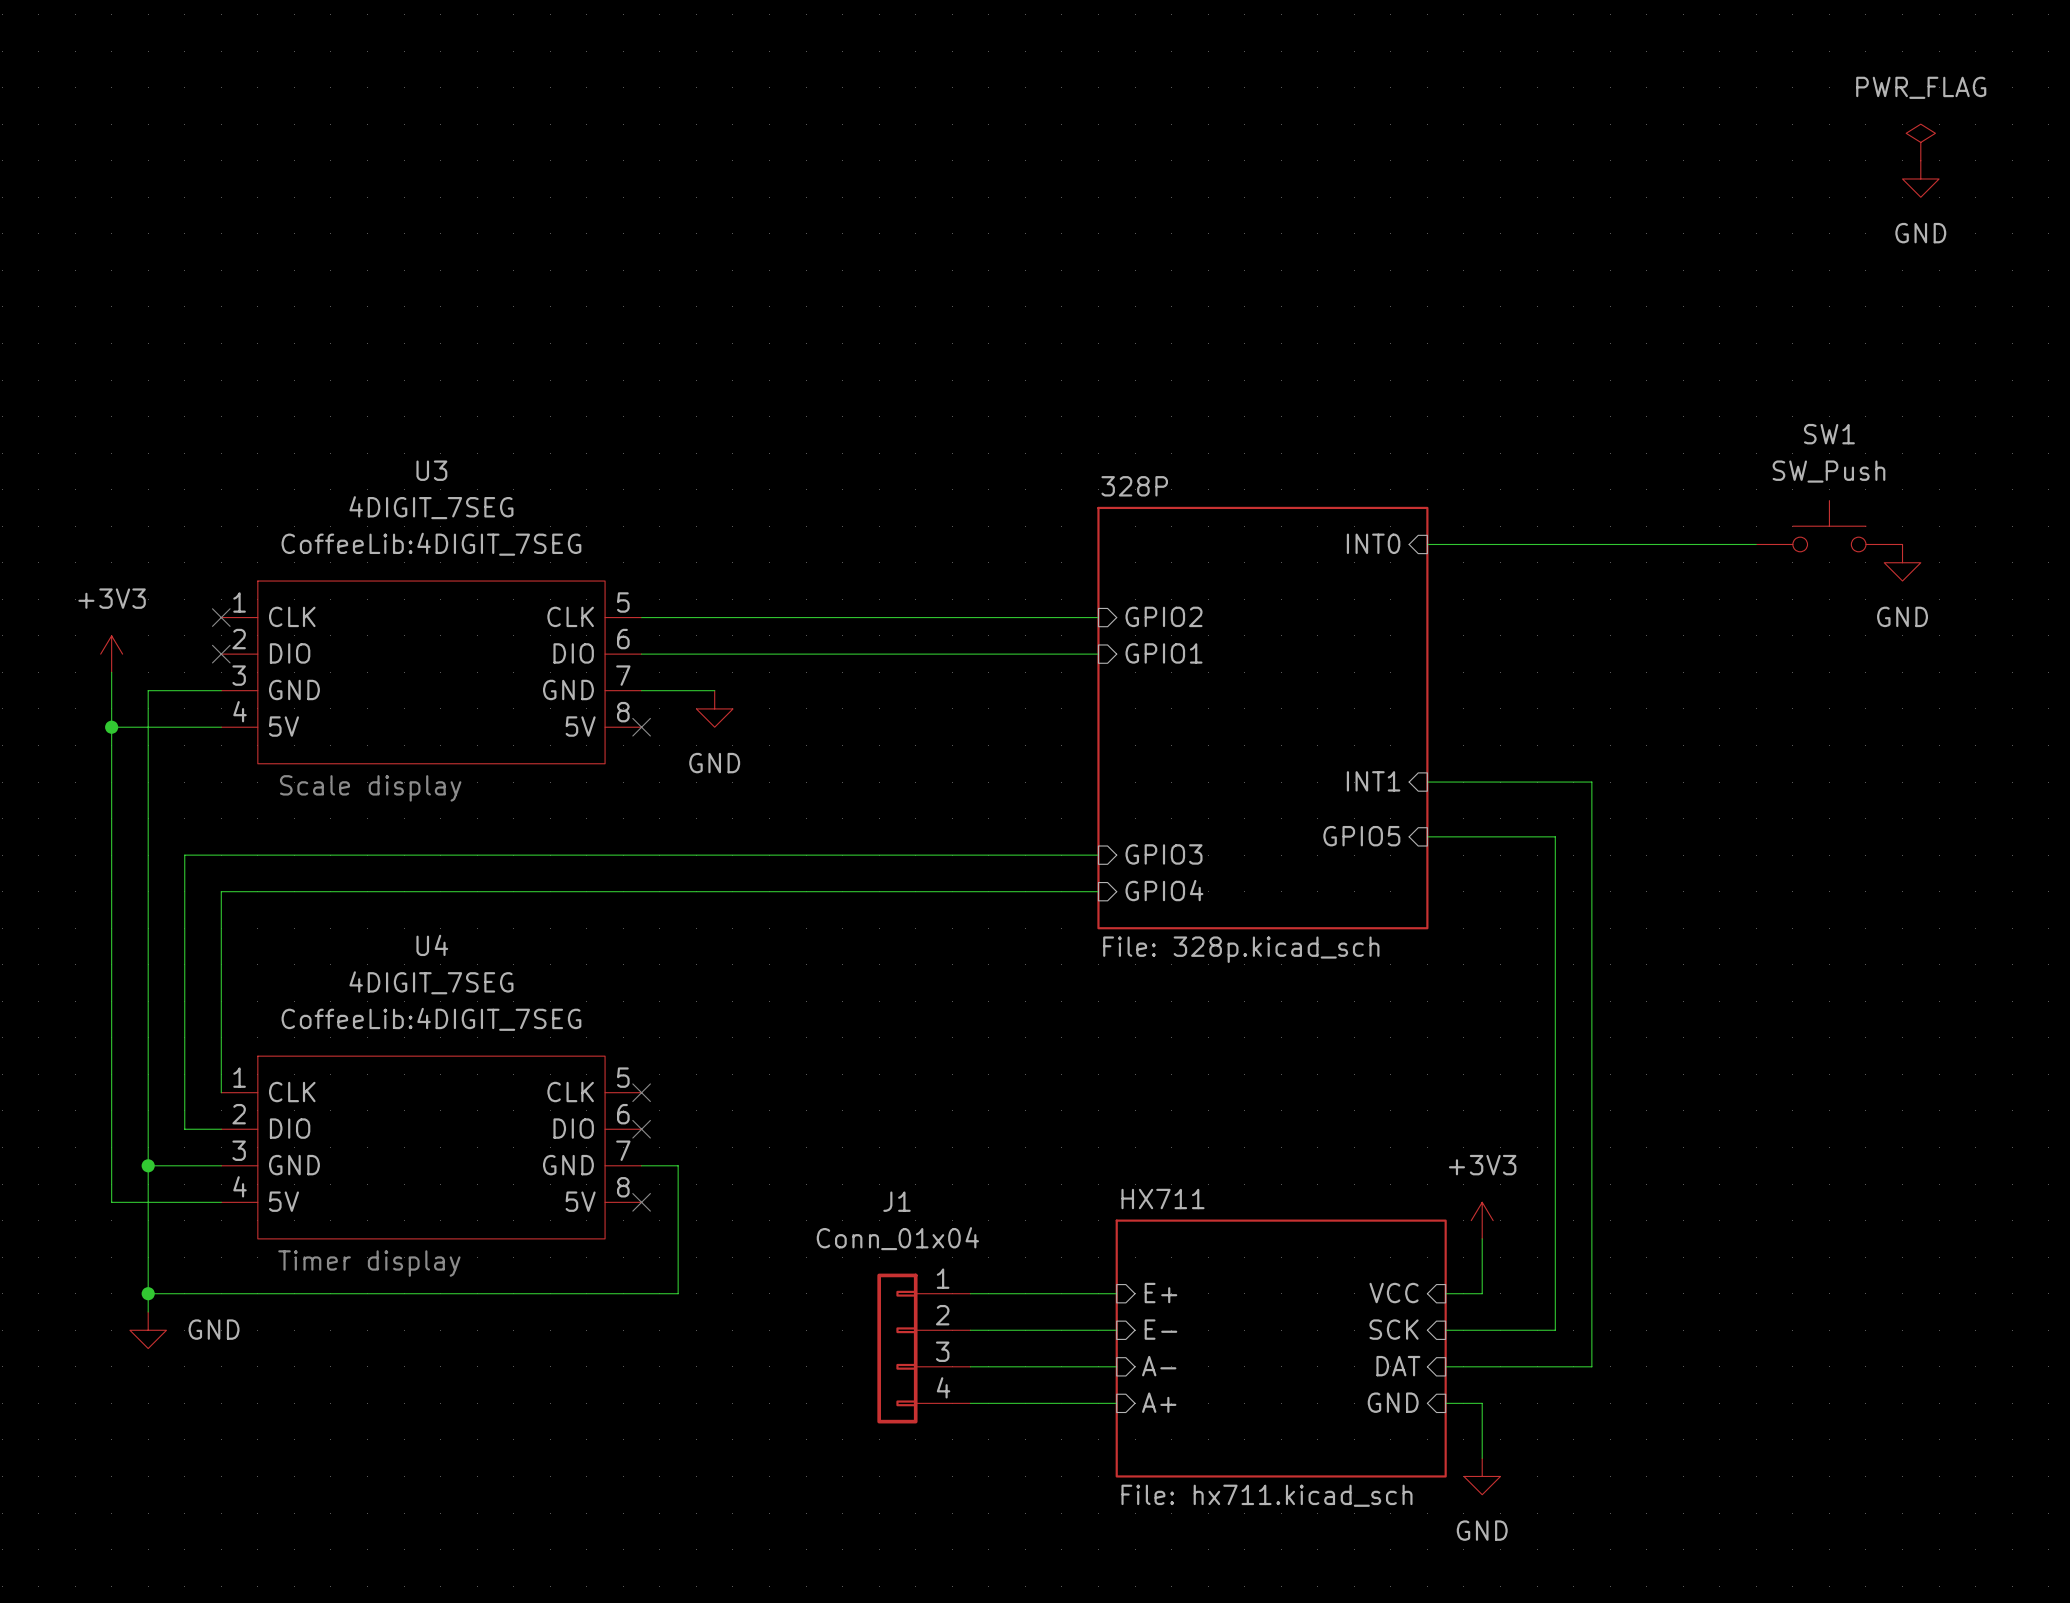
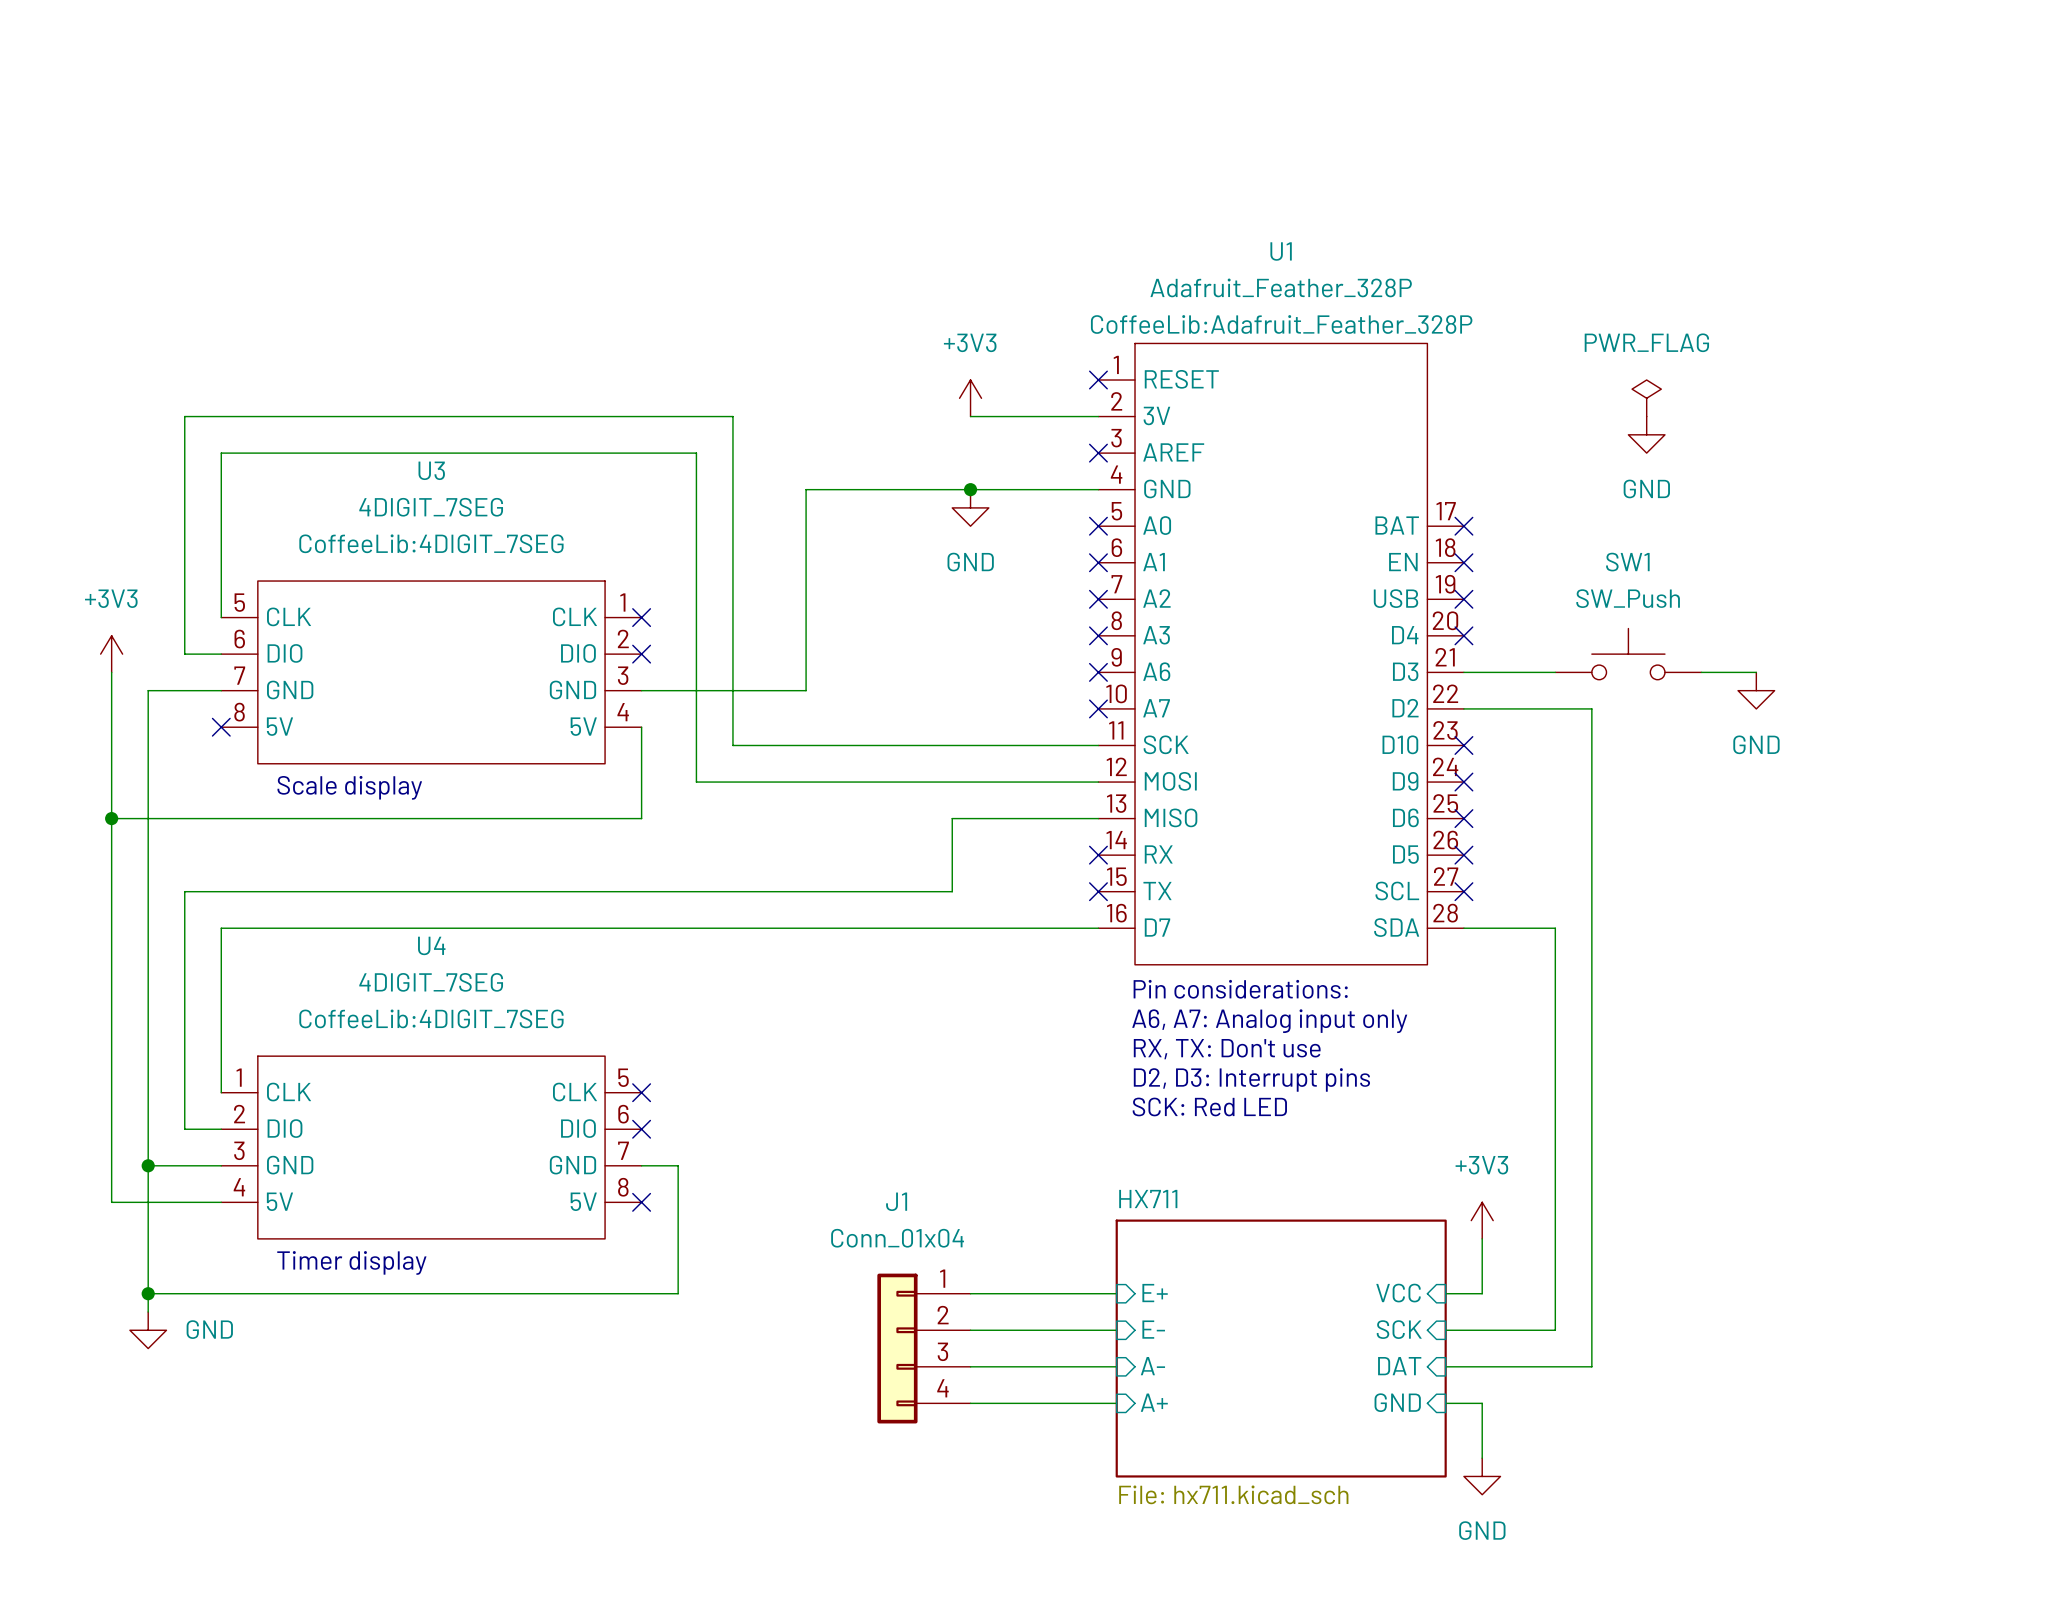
power symbol: PWR_FLAG (1920, 142) -> none
power symbol: GND (1920, 178) -> none
no-connect mark: none -> (1098, 380)
power symbol: none -> +3V3 (970, 398)
power symbol: none -> PWR_FLAG (1646, 398)
wire: none -> (970, 416) (1098, 416)
power symbol: none -> GND (1646, 434)
no-connect mark: none -> (1098, 453)
junction: none -> (970, 489)
wire: none -> (1098, 489) (806, 489) (806, 690) (714, 690)
no-connect mark: none -> (1098, 526)
no-connect mark: none -> (1463, 526)
SW1 position: (1829, 526) -> (1628, 654)
sheet pin: INT0 (1373, 543) -> none
wire: (1427, 544) (1756, 544) -> none
no-connect mark: none -> (1098, 562)
no-connect mark: none -> (1463, 562)
power symbol: GND (1902, 562) -> none
no-connect mark: none -> (1098, 599)
no-connect mark: none -> (1463, 599)
sheet pin: GPIO2 (1164, 616) -> none
wire: none -> (221, 617) (221, 453) (696, 453) (696, 782) (1098, 782)
no-connect mark: (221, 617) -> none
wire: (641, 617) (1098, 617) -> none
no-connect mark: none -> (641, 617)
no-connect mark: none -> (1098, 635)
no-connect mark: none -> (1463, 635)
sheet pin: GPIO1 (1164, 653) -> none
wire: none -> (221, 654) (184, 654) (184, 416) (732, 416) (732, 745) (1098, 745)
no-connect mark: (221, 654) -> none
wire: (641, 654) (1098, 654) -> none
no-connect mark: none -> (641, 654)
U1: none -> Adafruit_Feather_328P (1281, 654)
U3 flip: as is (431, 672) -> left-right (431, 672)
no-connect mark: none -> (1098, 672)
wire: none -> (1463, 672) (1555, 672)
wire: none -> (1701, 672) (1756, 672)
power symbol: none -> GND (1756, 690)
power symbol position: GND (714, 708) -> GND (970, 507)
no-connect mark: none -> (1098, 708)
sheet 328P: File: 328p.kicad_sch (1262, 718) -> none
wire: (111, 727) (221, 727) -> none
junction: (111, 727) -> none
no-connect mark: none -> (221, 727)
wire: none -> (641, 727) (641, 818) (111, 818)
no-connect mark: (641, 727) -> none
no-connect mark: none -> (1463, 745)
sheet pin: INT1 (1373, 781) -> none
wire: (1427, 782) (1591, 782) -> (1463, 708) (1591, 708) (1591, 782)
no-connect mark: none -> (1463, 782)
junction: none -> (111, 818)
no-connect mark: none -> (1463, 818)
sheet pin: GPIO5 (1361, 836) -> none
wire: (1427, 836) (1555, 836) (1555, 928) -> (1463, 928) (1555, 928)
sheet pin: GPIO3 (1164, 854) -> none
wire: (1098, 855) (184, 855) (184, 891) -> none
no-connect mark: none -> (1098, 855)
no-connect mark: none -> (1463, 855)
sheet pin: GPIO4 (1164, 890) -> none
wire: (221, 891) (221, 928) -> (221, 891) (184, 891)
wire: (952, 891) (1098, 891) -> (952, 891) (952, 818) (1098, 818)
no-connect mark: none -> (1098, 891)
no-connect mark: none -> (1463, 891)
wire: none -> (221, 928) (1098, 928)
text: none -> Pin considerations: (1240, 989)
text: none -> A6, A7: Analog input only (1269, 1021)
text: none -> RX, TX: Don't use (1227, 1049)
text: none -> D2, D3: Interrupt pins (1251, 1079)
text: none -> SCK: Red LED (1209, 1106)

